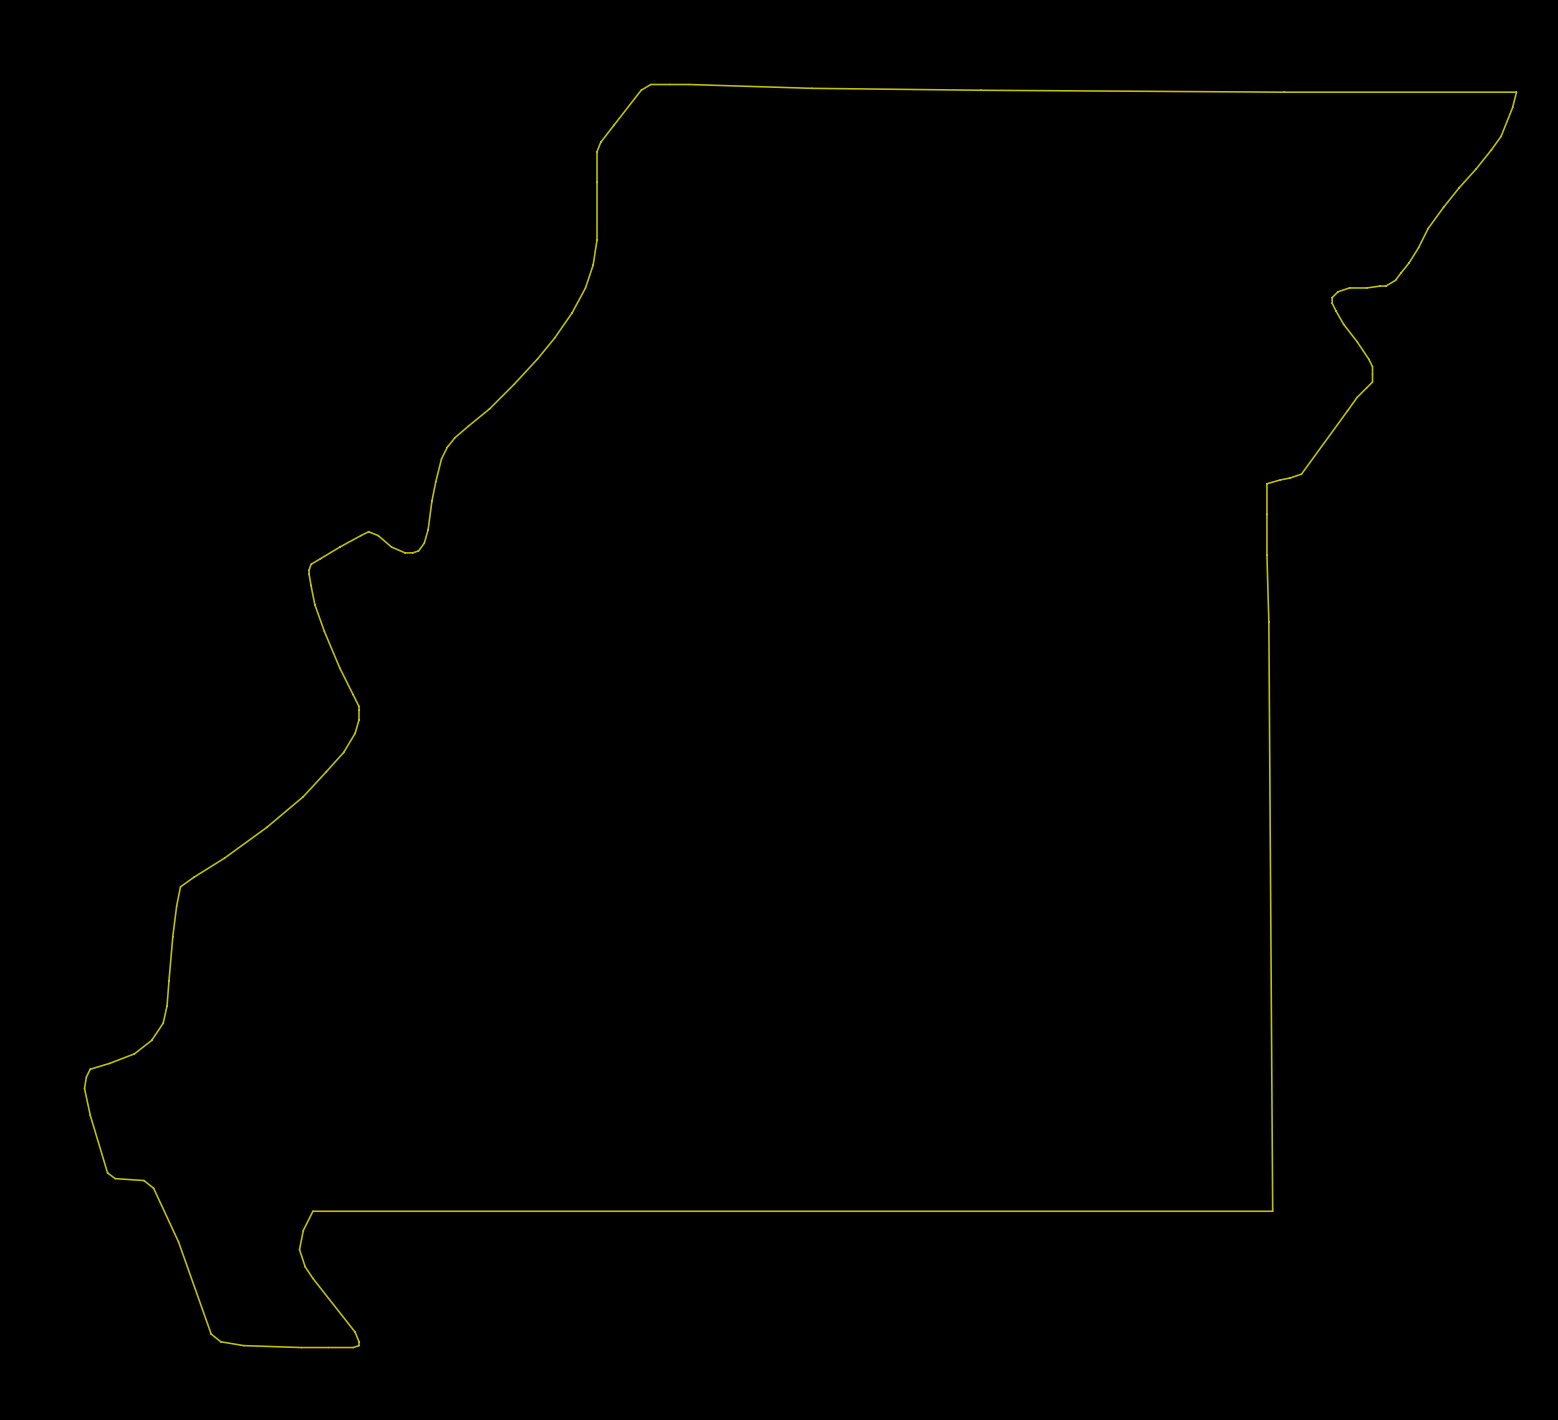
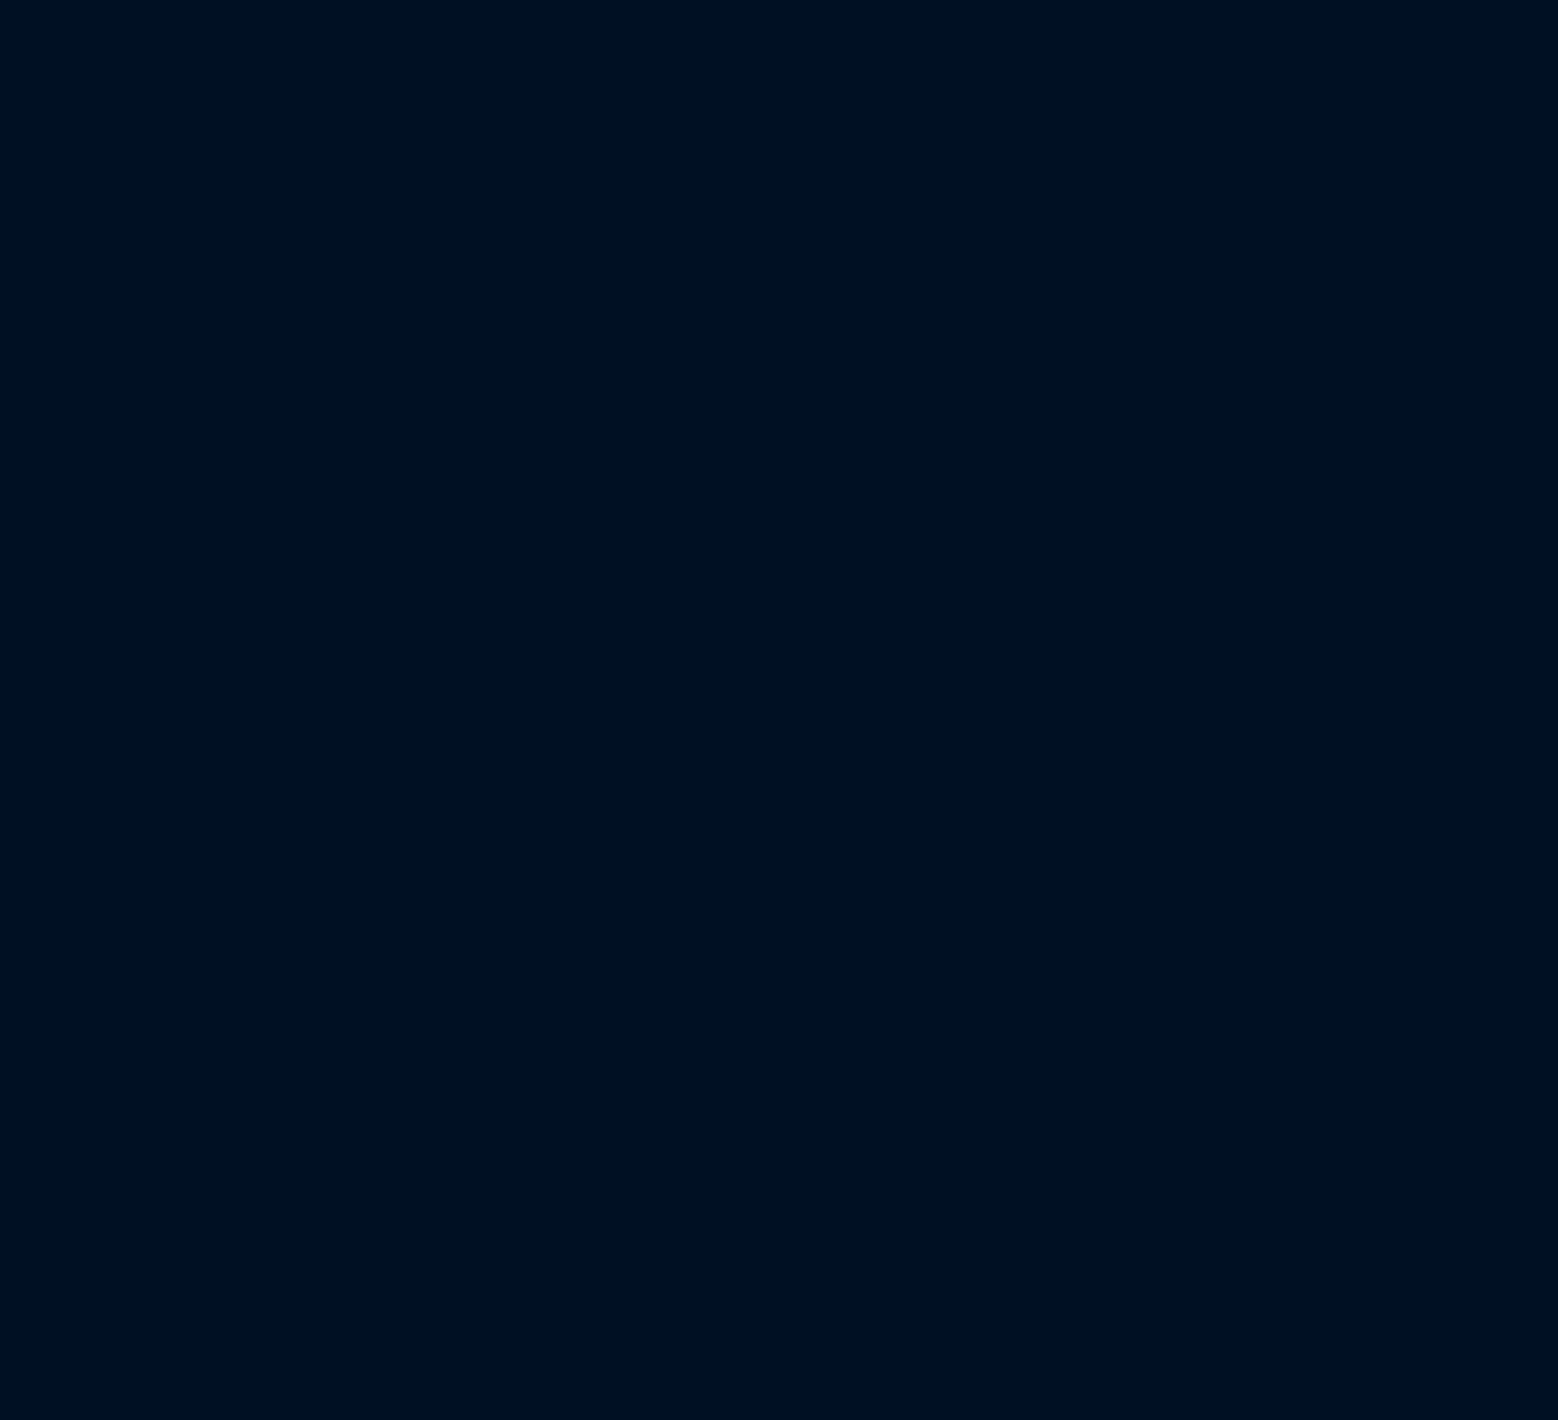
board edge: (689, 84) (980, 90) (1516, 92) (1501, 136) (1443, 207) (1428, 228) (1408, 263) (1395, 280) (1385, 286) (1349, 287) (1337, 291) (1332, 297) (1332, 303) (1343, 324) (1372, 366) (1372, 382) (1357, 397) (1301, 474) (1266, 483) (1272, 1211) (312, 1211) (303, 1230) (299, 1249) (305, 1266) (355, 1332) (358, 1345) (353, 1347) (301, 1347) (243, 1345) (220, 1341) (211, 1334) (178, 1241) (153, 1188) (144, 1180) (115, 1178) (107, 1172) (90, 1115) (84, 1088) (86, 1076) (90, 1069) (134, 1053) (151, 1040) (163, 1023) (167, 1005) (172, 936) (180, 886) (266, 827) (303, 796) (343, 752) (355, 733) (358, 719) (358, 706) (339, 668) (314, 604) (309, 573) (311, 564) (368, 531) (378, 535) (391, 547) (405, 552) (418, 550) (424, 543) (428, 529) (435, 481) (441, 458) (447, 447) (454, 437) (489, 408) (537, 358) (572, 312) (585, 287) (593, 264) (597, 239) (597, 151) (600, 142) (641, 90) (650, 84) (689, 84) -> none

